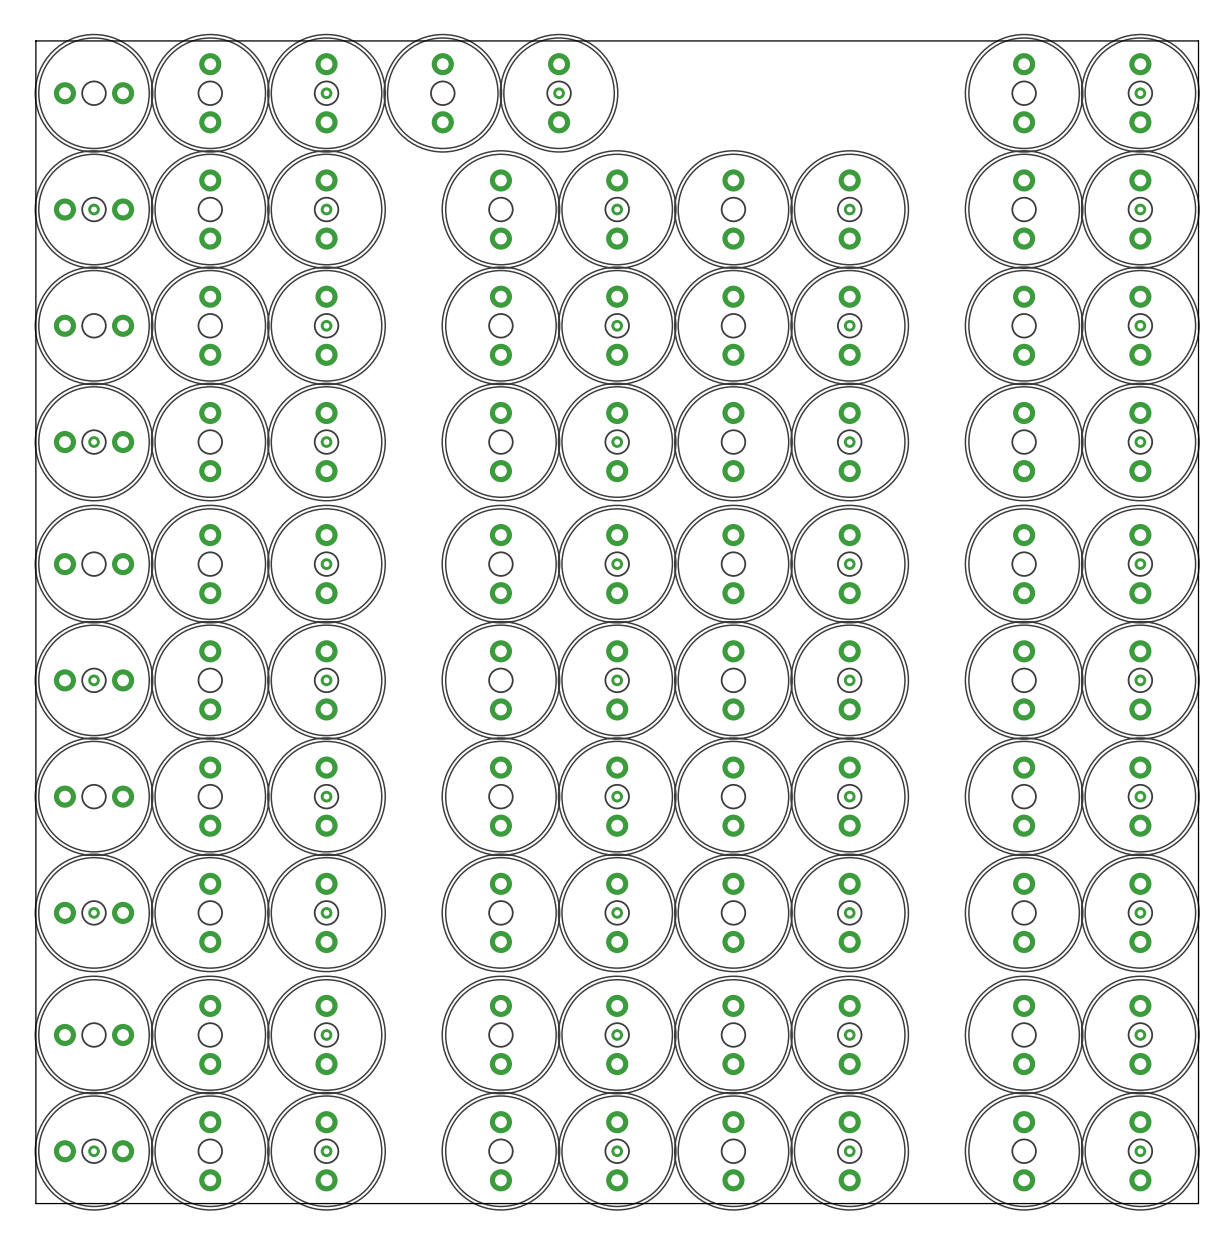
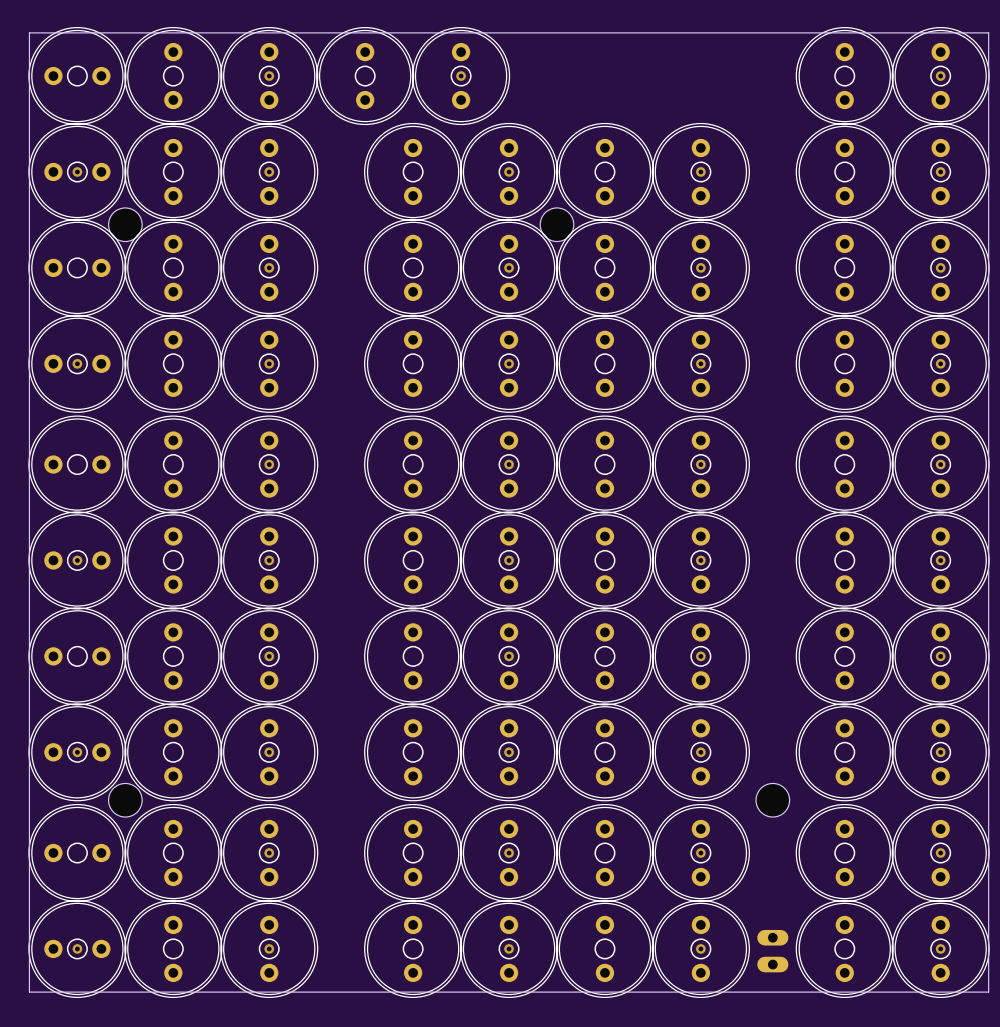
hole: none -> (125, 224)
hole: none -> (557, 224)
hole: none -> (125, 800)
hole: none -> (772, 800)
part: none -> (772, 951)

